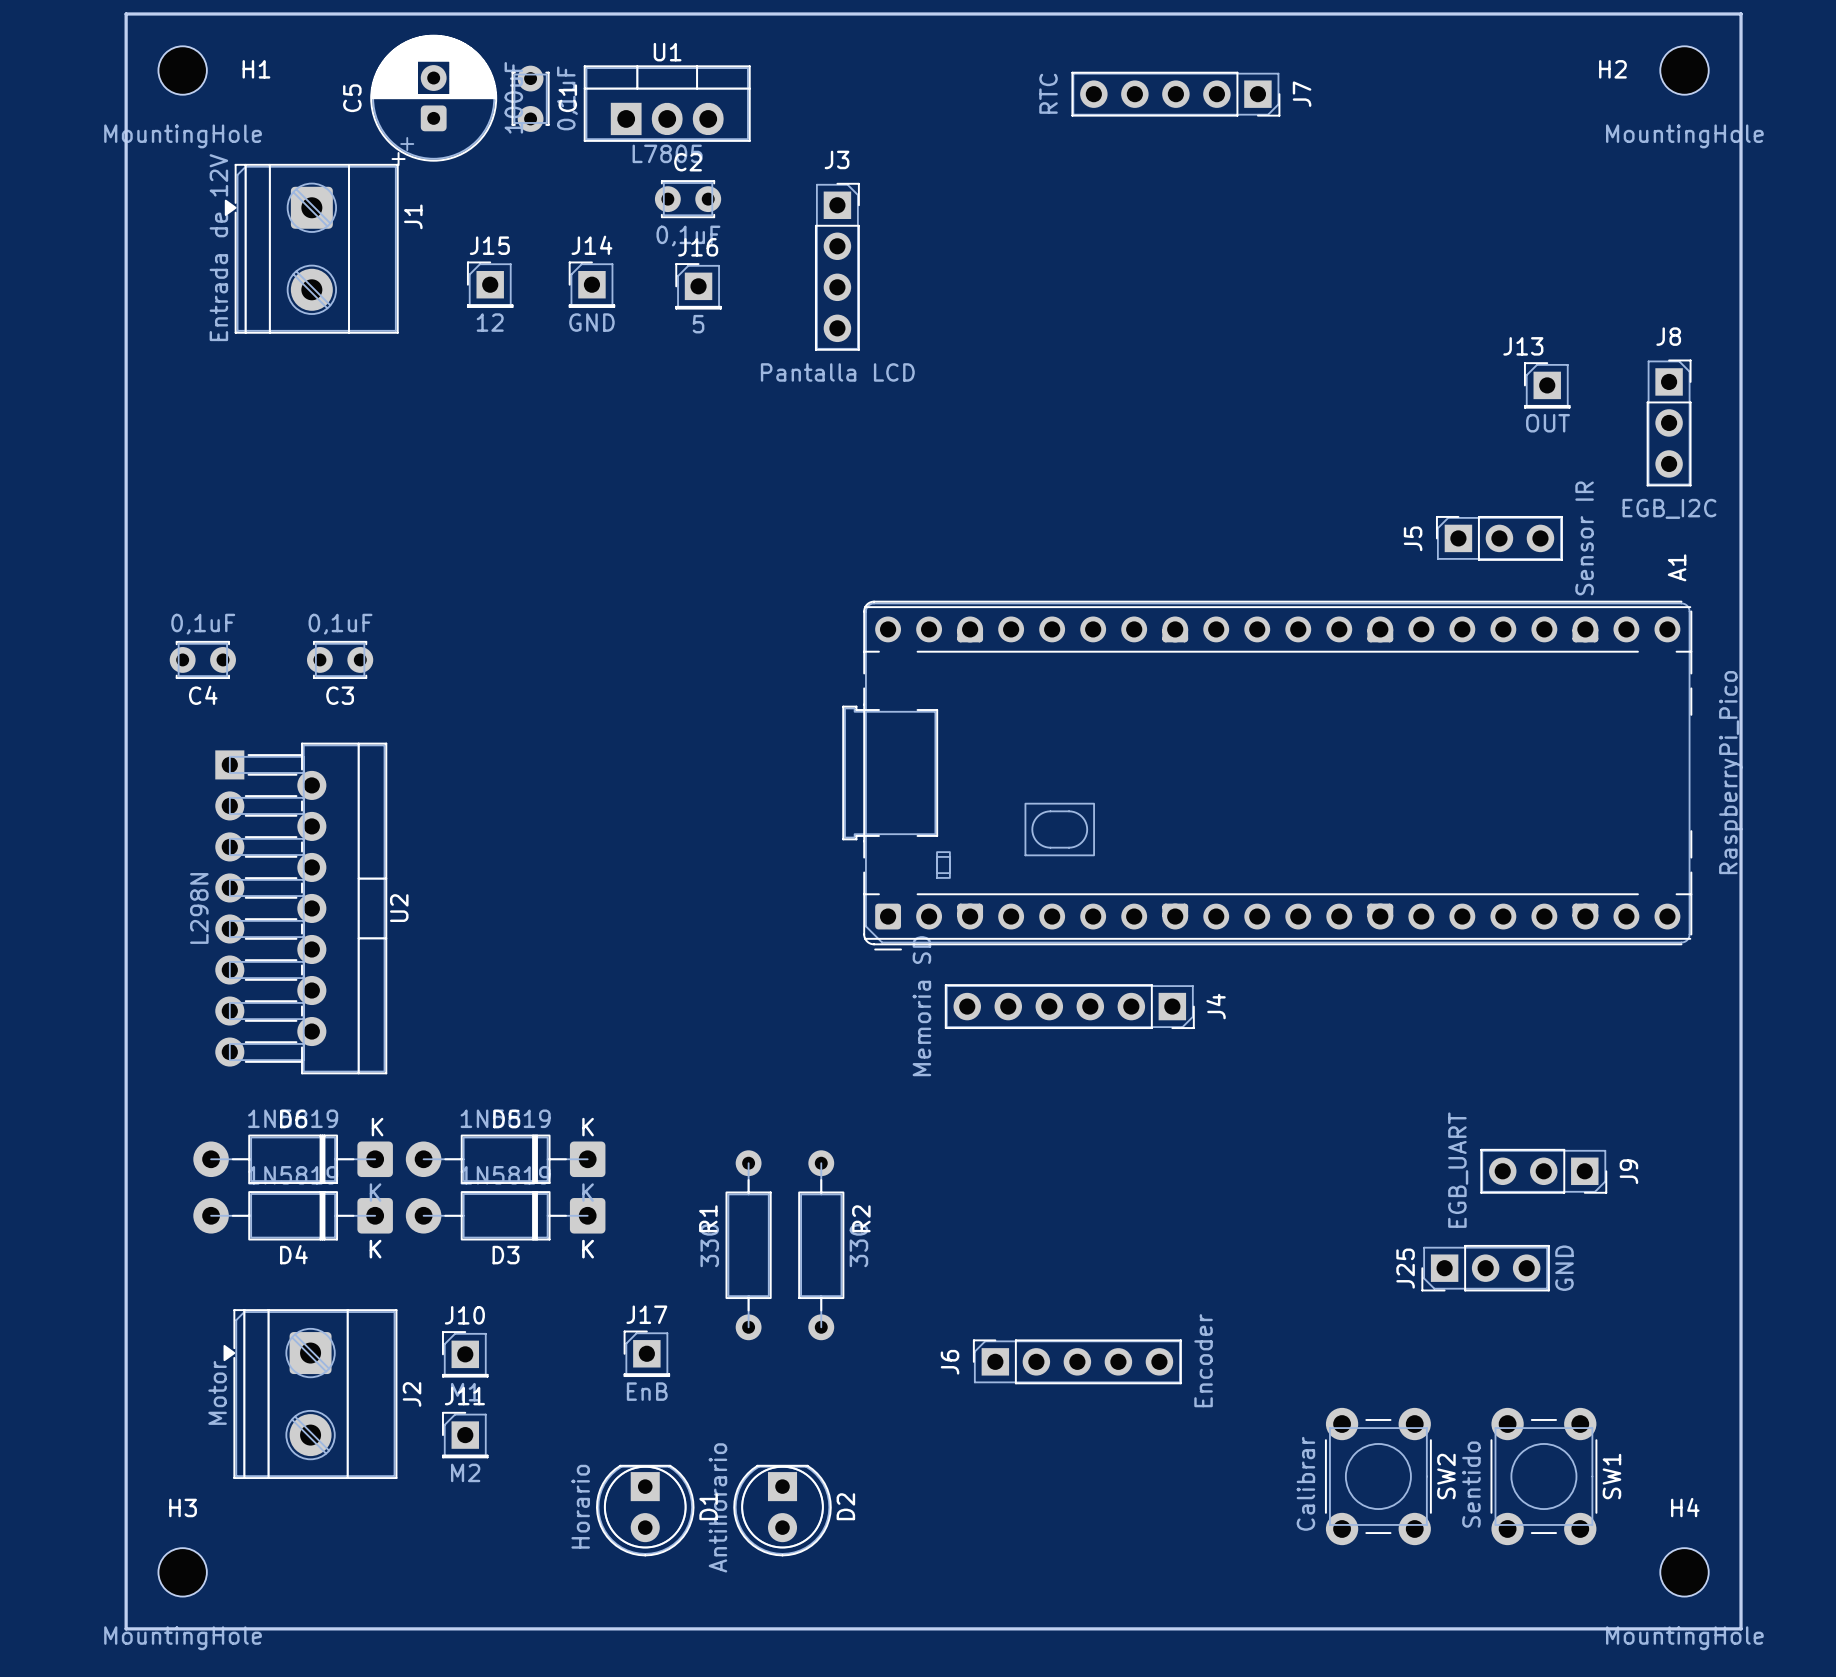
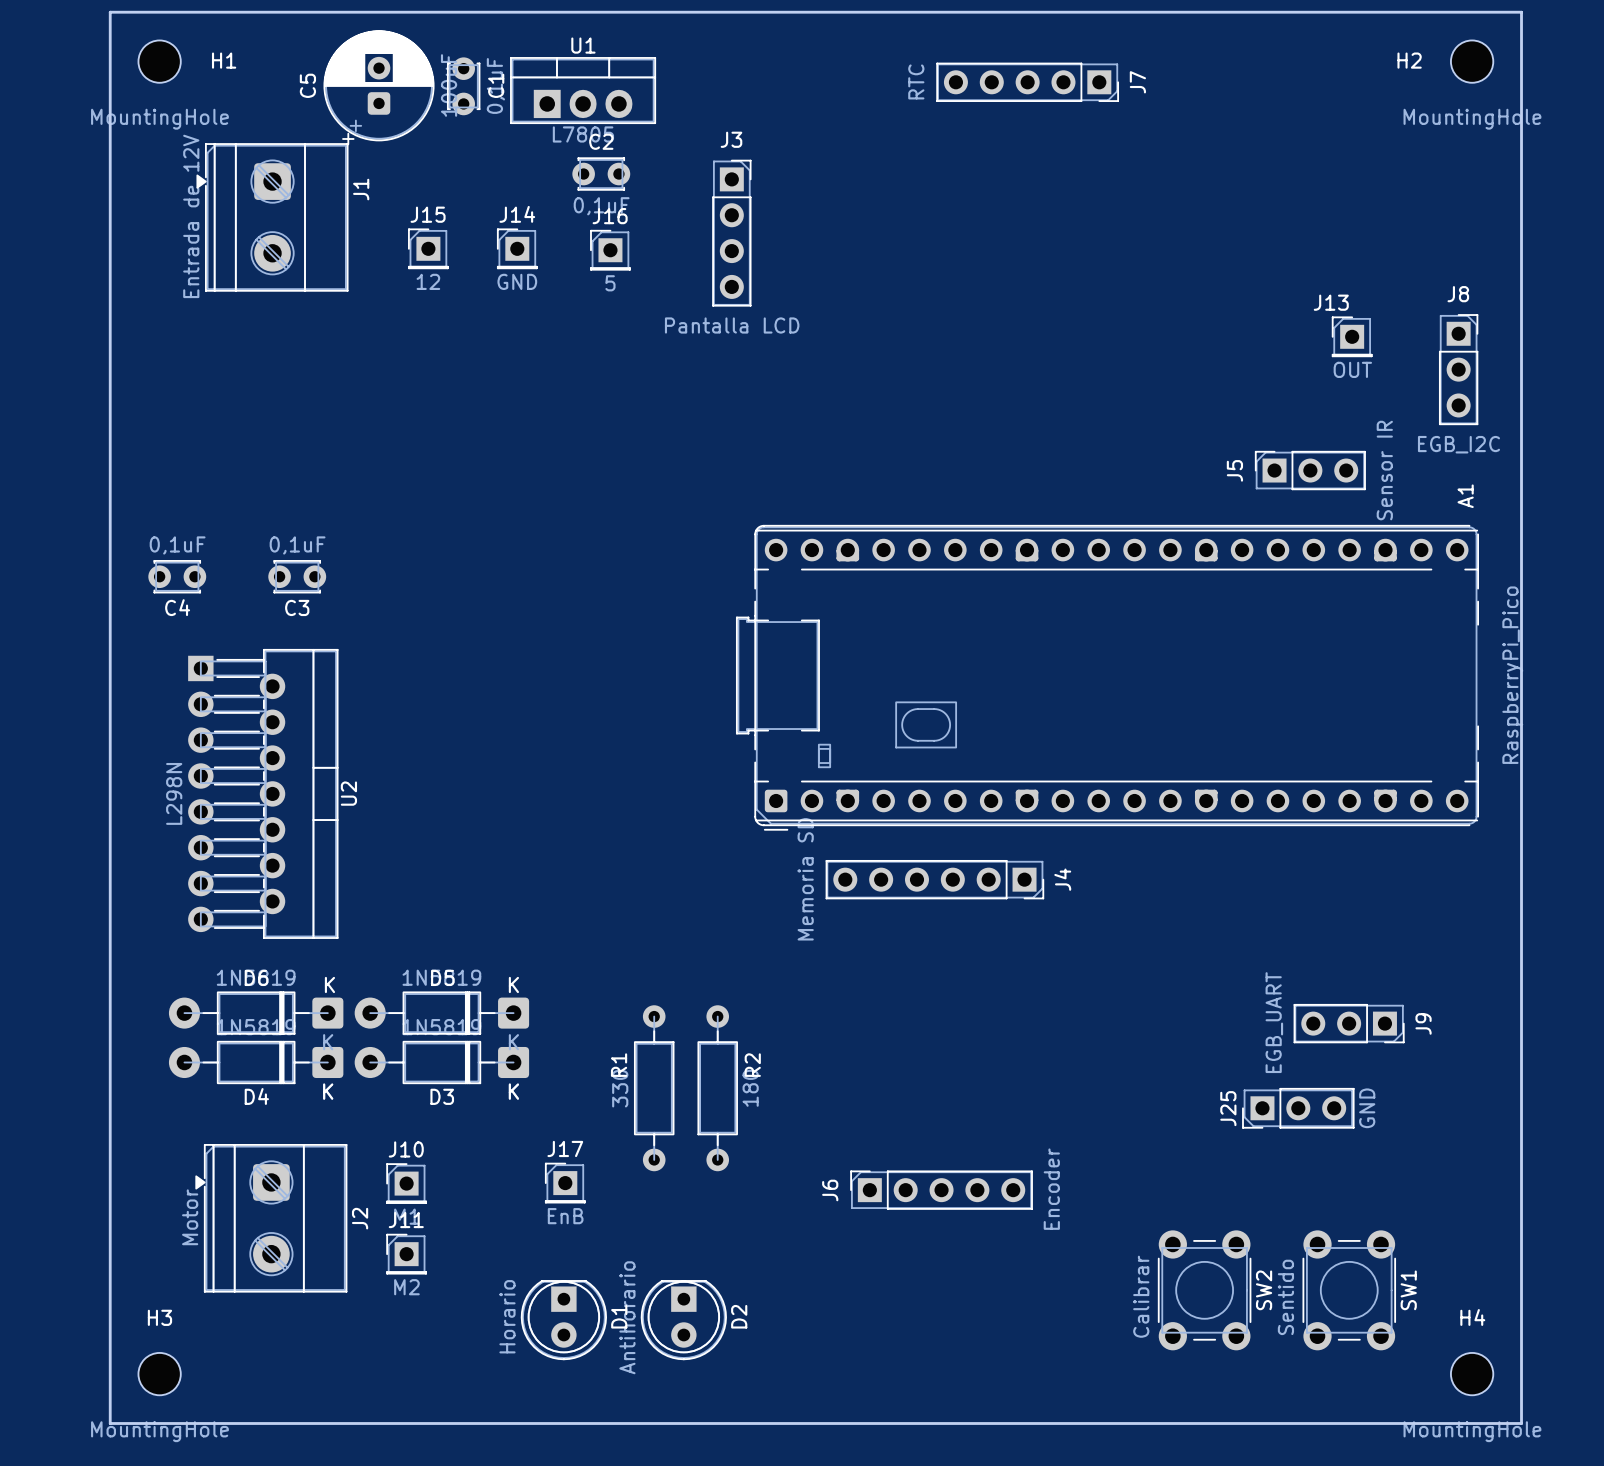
R2 value: 330 (858, 1245) -> 180 (750, 1088)

